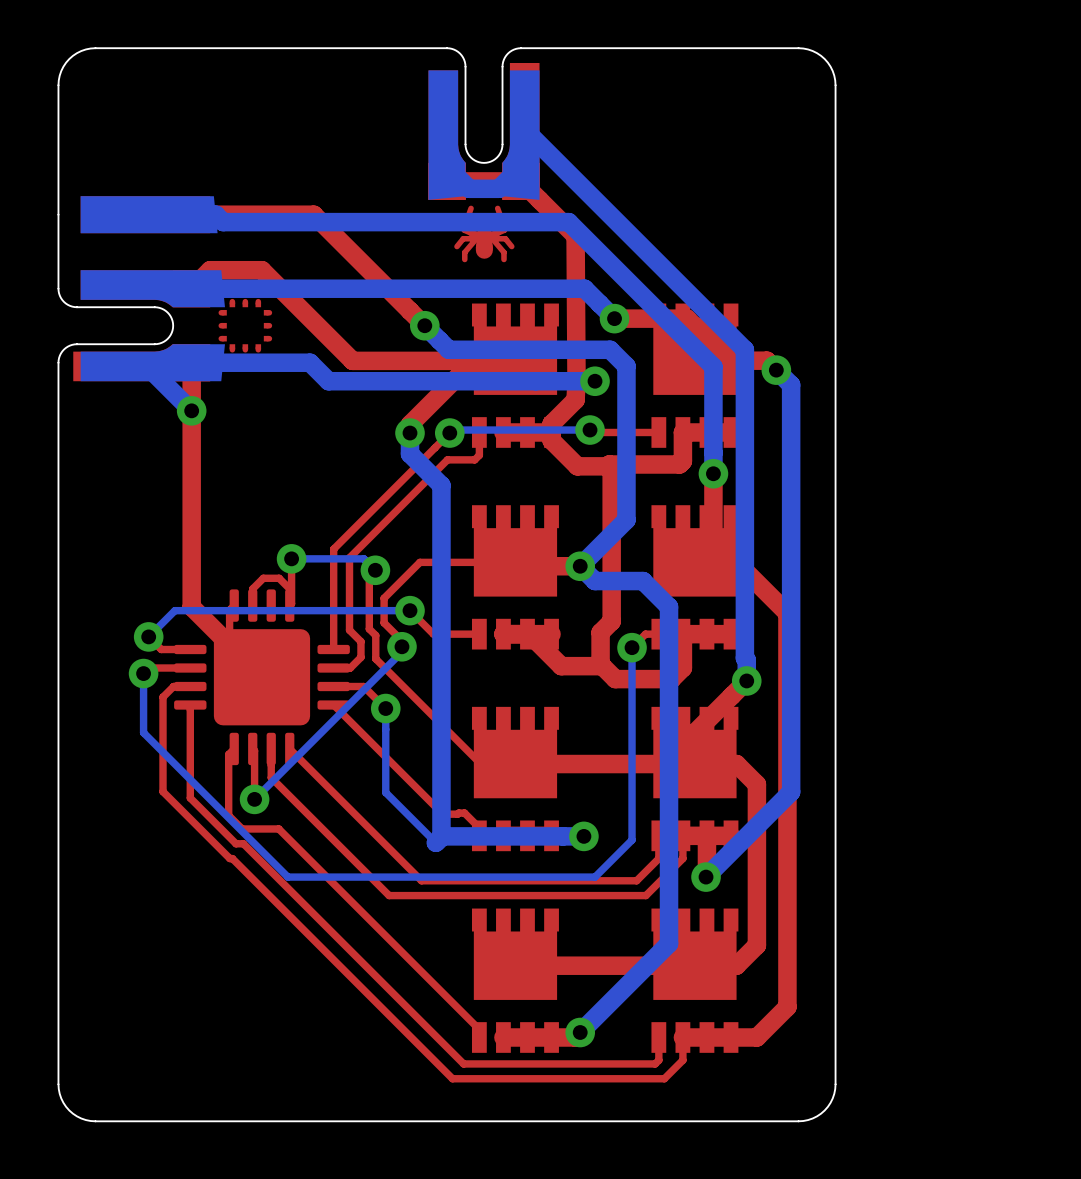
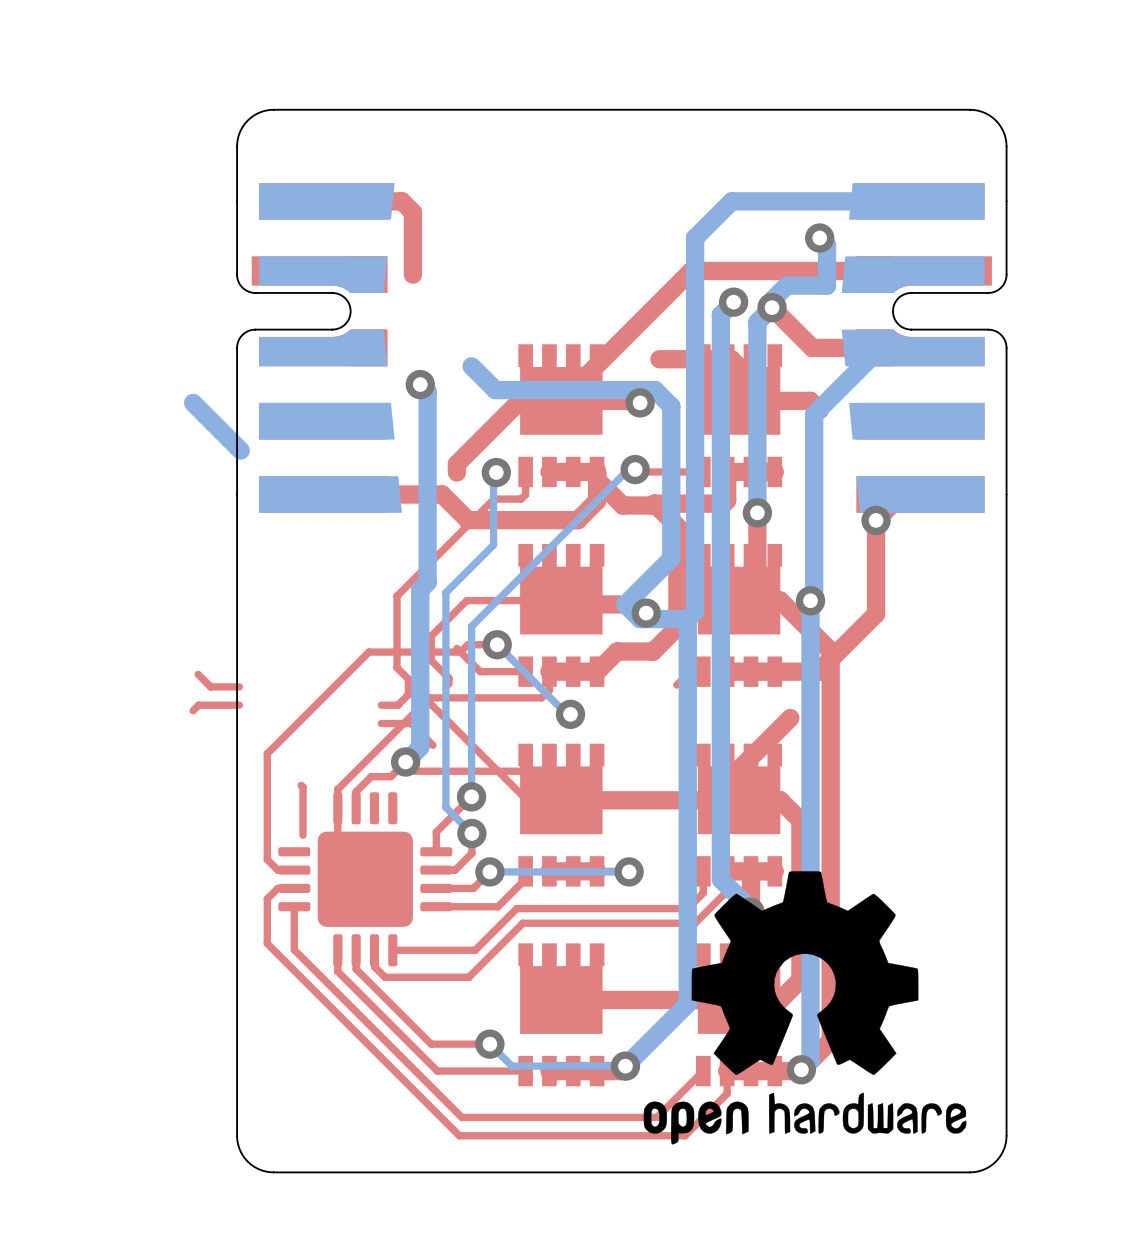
board edge: (447, 48) (95, 48) (81, 51) (66, 62) (58, 80) (58, 214) -> none
board edge: (521, 48) (803, 48) (812, 51) (824, 59) (834, 75) (835, 1084) (832, 1098) (821, 1113) (812, 1118) (798, 1121) (95, 1121) (81, 1118) (69, 1110) (61, 1098) (58, 1084) (58, 362) -> none
bottom track: (447, 125) (447, 166) (469, 188) (498, 188) (521, 166) (521, 125) (744, 349) (744, 658) (746, 660) (746, 680) -> none
part: (484, 154) -> none
top track: none -> (323, 201) (401, 201) (412, 212) (412, 274)
board edge: none -> (1006, 201) (1006, 146) (1004, 134) (992, 117) (982, 111) (969, 109) (269, 109) (250, 117) (239, 134) (237, 146) (237, 201)
top track: (447, 181) (521, 181) (575, 235) (576, 381) -> none
via: none -> (819, 238)
top track: (145, 214) (313, 214) (424, 325) -> none
bottom track: (147, 214) (215, 214) (223, 222) (568, 222) (713, 366) -> (819, 238) (827, 245) (827, 285) (786, 285) (772, 300) (772, 307) (757, 322) (757, 406)
top track: none -> (874, 274) (870, 270) (691, 270) (561, 400) (638, 400) (640, 402)
bottom track: none -> (733, 302) (720, 314) (720, 879) (753, 912)
via: none -> (733, 302)
top track: none -> (772, 307) (812, 347) (874, 347)
via: none -> (772, 307)
bottom track: (136, 288) (584, 288) (614, 318) -> none
part: (164, 288) -> none
top track: (191, 288) (210, 270) (261, 270) (352, 360) (473, 360) -> none
part: none -> (319, 347)
part: none -> (924, 347)
bottom track: none -> (929, 347) (880, 347) (814, 414) (814, 597) (810, 600) (810, 1060) (801, 1069)
via: (614, 318) -> none
via: (424, 325) -> none
bottom track: none -> (420, 384) (427, 391) (427, 582) (420, 589) (420, 747) (405, 762)
via: none -> (420, 384)
bottom track: (136, 362) (310, 362) (328, 381) (595, 381) -> none
top track: (191, 362) (191, 606) (261, 677) (229, 644) (229, 610) (234, 605) -> none
bottom track: (776, 370) (791, 384) (791, 791) (706, 877) -> none
via: (776, 370) -> none
top track: (576, 381) (575, 399) (551, 424) (551, 432) -> none
via position: (595, 381) -> (640, 402)
via: (191, 410) -> none
bottom track: none -> (632, 465) (471, 626) (471, 796)
bottom track: (590, 430) (452, 430) (449, 433) -> none
bottom track: (410, 433) (410, 453) (441, 485) (441, 837) -> none
via: (410, 433) -> none
top track: (449, 433) (333, 549) (333, 649) -> none
bottom track: none -> (493, 479) (493, 544) (445, 592) (445, 807) (471, 833)
top track: none -> (597, 479) (597, 500) (577, 520) (467, 520) (442, 494) (323, 494)
top track: none -> (902, 494) (876, 520) (876, 614) (818, 671) (774, 671)
board edge: none -> (1006, 494) (1006, 1135) (1002, 1151) (995, 1161) (985, 1168) (969, 1172) (273, 1172) (257, 1168) (247, 1161) (240, 1151) (237, 1135) (237, 494)
top track: (611, 466) (611, 621) (600, 632) (600, 664) (615, 679) (671, 679) (682, 668) (682, 634) -> (656, 505) (677, 526) (677, 627) (653, 651) (617, 651) (597, 671)
via: none -> (876, 520)
top track: (291, 558) (291, 603) (289, 605) (289, 588) (279, 578) (263, 578) (252, 588) (252, 605) -> none
bottom track: (291, 558) (363, 558) (375, 570) -> none
via: (291, 558) -> none
via: none -> (810, 600)
via position: (580, 566) -> (646, 613)
via: (375, 570) -> none
bottom track: (643, 581) (669, 606) (669, 943) (643, 969) -> (918, 201) (731, 201) (695, 238) (695, 611) (687, 619) (687, 1003)
top track: none -> (497, 644) (467, 644) (460, 652) (368, 652) (267, 753) (267, 859) (277, 870) (294, 870)
bottom track: none -> (497, 644) (566, 714) (570, 714)
via: none -> (497, 644)
bottom track: (410, 610) (174, 610) (148, 636) -> none
via: (410, 610) -> none
top track: none -> (549, 671) (549, 690) (541, 697) (429, 697) (337, 789) (337, 851) (365, 879)
top track: (529, 634) (561, 666) (602, 666) -> none
via: (148, 636) -> none
bottom track: (401, 646) (401, 651) (254, 799) -> none
via: (401, 646) -> none
bottom track: (632, 647) (632, 840) (595, 877) (287, 877) (143, 732) (143, 673) -> none
via: (632, 647) -> none
via: (143, 673) -> none
part position: (261, 677) -> (365, 879)
via: none -> (570, 714)
via: (746, 680) -> none
top track: (190, 686) (173, 686) (163, 697) (163, 791) (452, 1078) (664, 1078) -> (294, 888) (277, 888) (267, 898) (267, 943) (459, 1135) (685, 1135) (708, 1111)
top track: (190, 705) (190, 798) (236, 843) (243, 843) (463, 1063) (655, 1063) (658, 1060) (658, 1037) -> (294, 906) (294, 949) (461, 1117) (656, 1117) (703, 1071)
top track: (333, 705) (442, 814) (464, 813) (479, 827) (479, 835) -> (436, 906) (497, 906) (525, 879) (525, 871)
bottom track: (385, 708) (385, 792) (435, 842) (443, 836) -> none
via position: (385, 708) -> (405, 762)
top track: (234, 748) (228, 754) (228, 815) (242, 828) (278, 828) (479, 1029) (479, 1037) -> (337, 950) (337, 971) (437, 1071) (525, 1071)
top track: (271, 748) (271, 777) (389, 895) (645, 895) (682, 858) (682, 855) -> (374, 950) (374, 966) (385, 977) (468, 977) (522, 923) (695, 923) (727, 891)
top track: (289, 748) (421, 880) (636, 880) (658, 857) -> (392, 950) (475, 950) (516, 908) (687, 908) (703, 893)
top track: none -> (471, 796) (436, 832) (436, 851)
via: none -> (471, 796)
top track: none -> (561, 800) (532, 771) (396, 771) (390, 776) (371, 776) (356, 791) (356, 808)
top track: none -> (471, 833) (471, 853) (455, 870) (436, 870)
via: none -> (471, 833)
via: (254, 799) -> none
drawing: none -> [643, 871, 967, 1145]
top track: none -> (489, 871) (473, 888) (436, 888)
via: none -> (489, 871)
bottom track width: thick (580, 836) (443, 836) -> thin (625, 871) (489, 871)
top track: none -> (356, 950) (356, 969) (431, 1044) (489, 1044)
bottom track: none -> (489, 1044) (511, 1066) (625, 1066)
via: none -> (489, 1044)
via: none -> (801, 1069)

